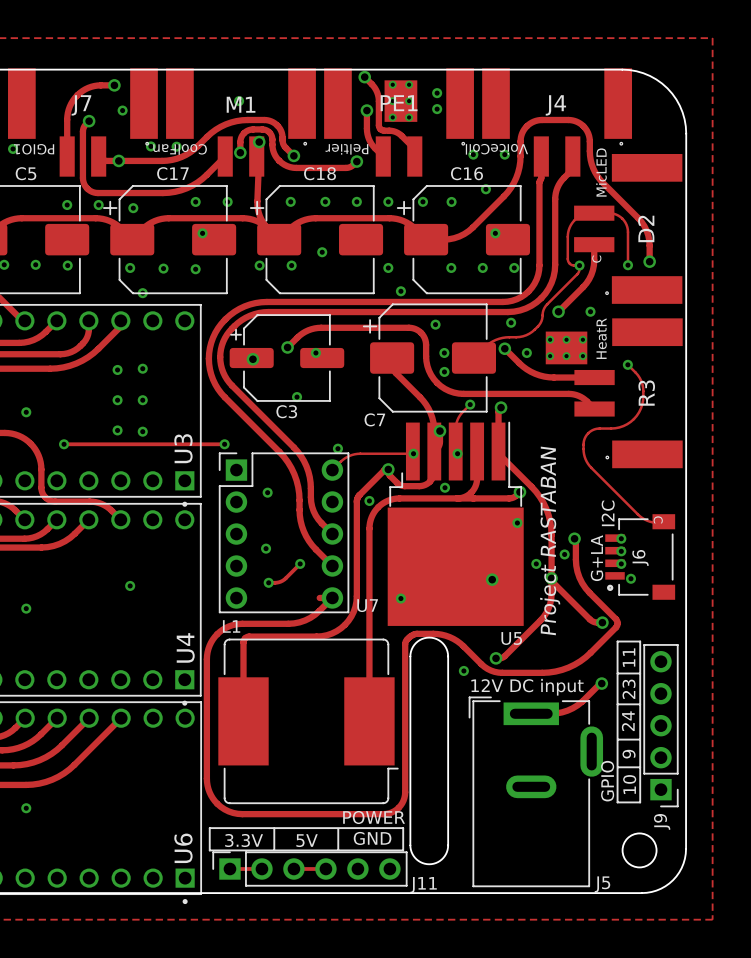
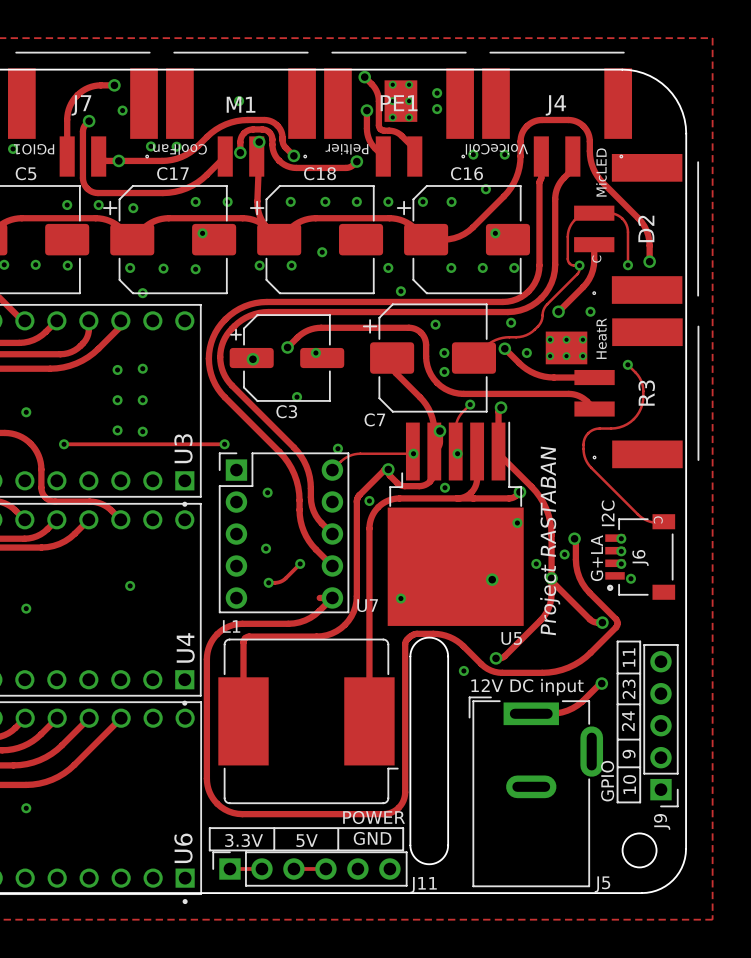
J7 footprint: [8, 68, 158, 177] -> [8, 51, 158, 177]
M1 footprint: [166, 68, 316, 177] -> [166, 51, 316, 177]
PE1 footprint: [324, 68, 474, 177] -> [324, 51, 474, 177]
J4 footprint: [482, 68, 633, 177] -> [482, 51, 633, 177]
D2 footprint: [574, 154, 683, 304] -> [574, 154, 699, 304]
R3 footprint: [574, 318, 683, 469] -> [574, 318, 700, 469]

